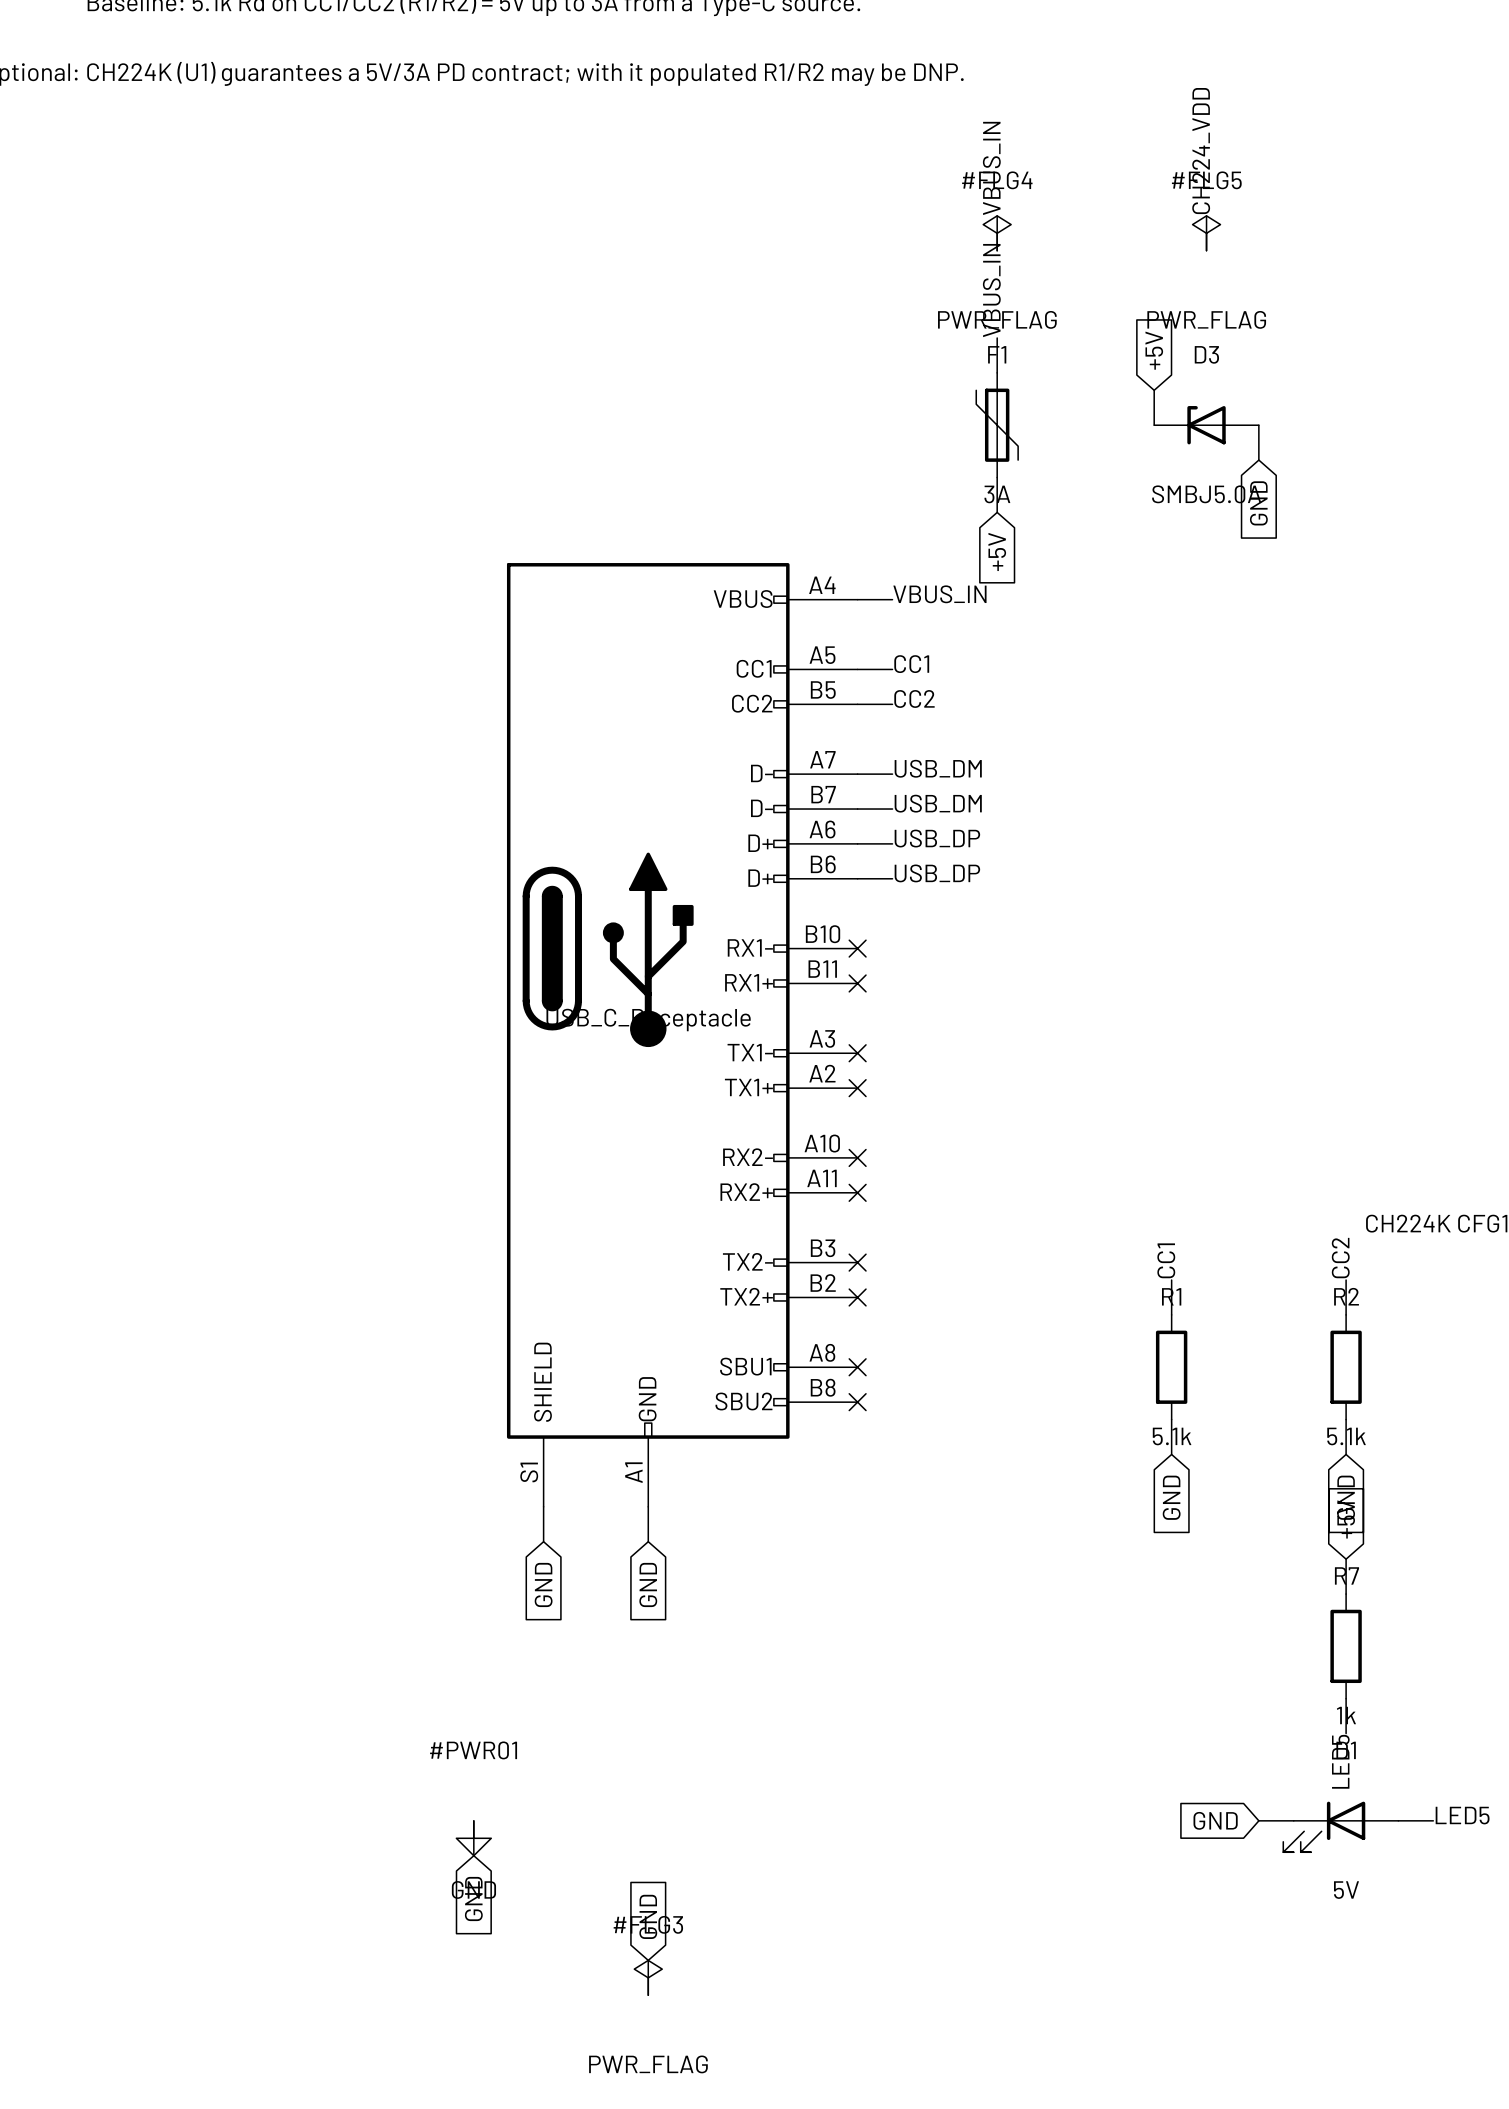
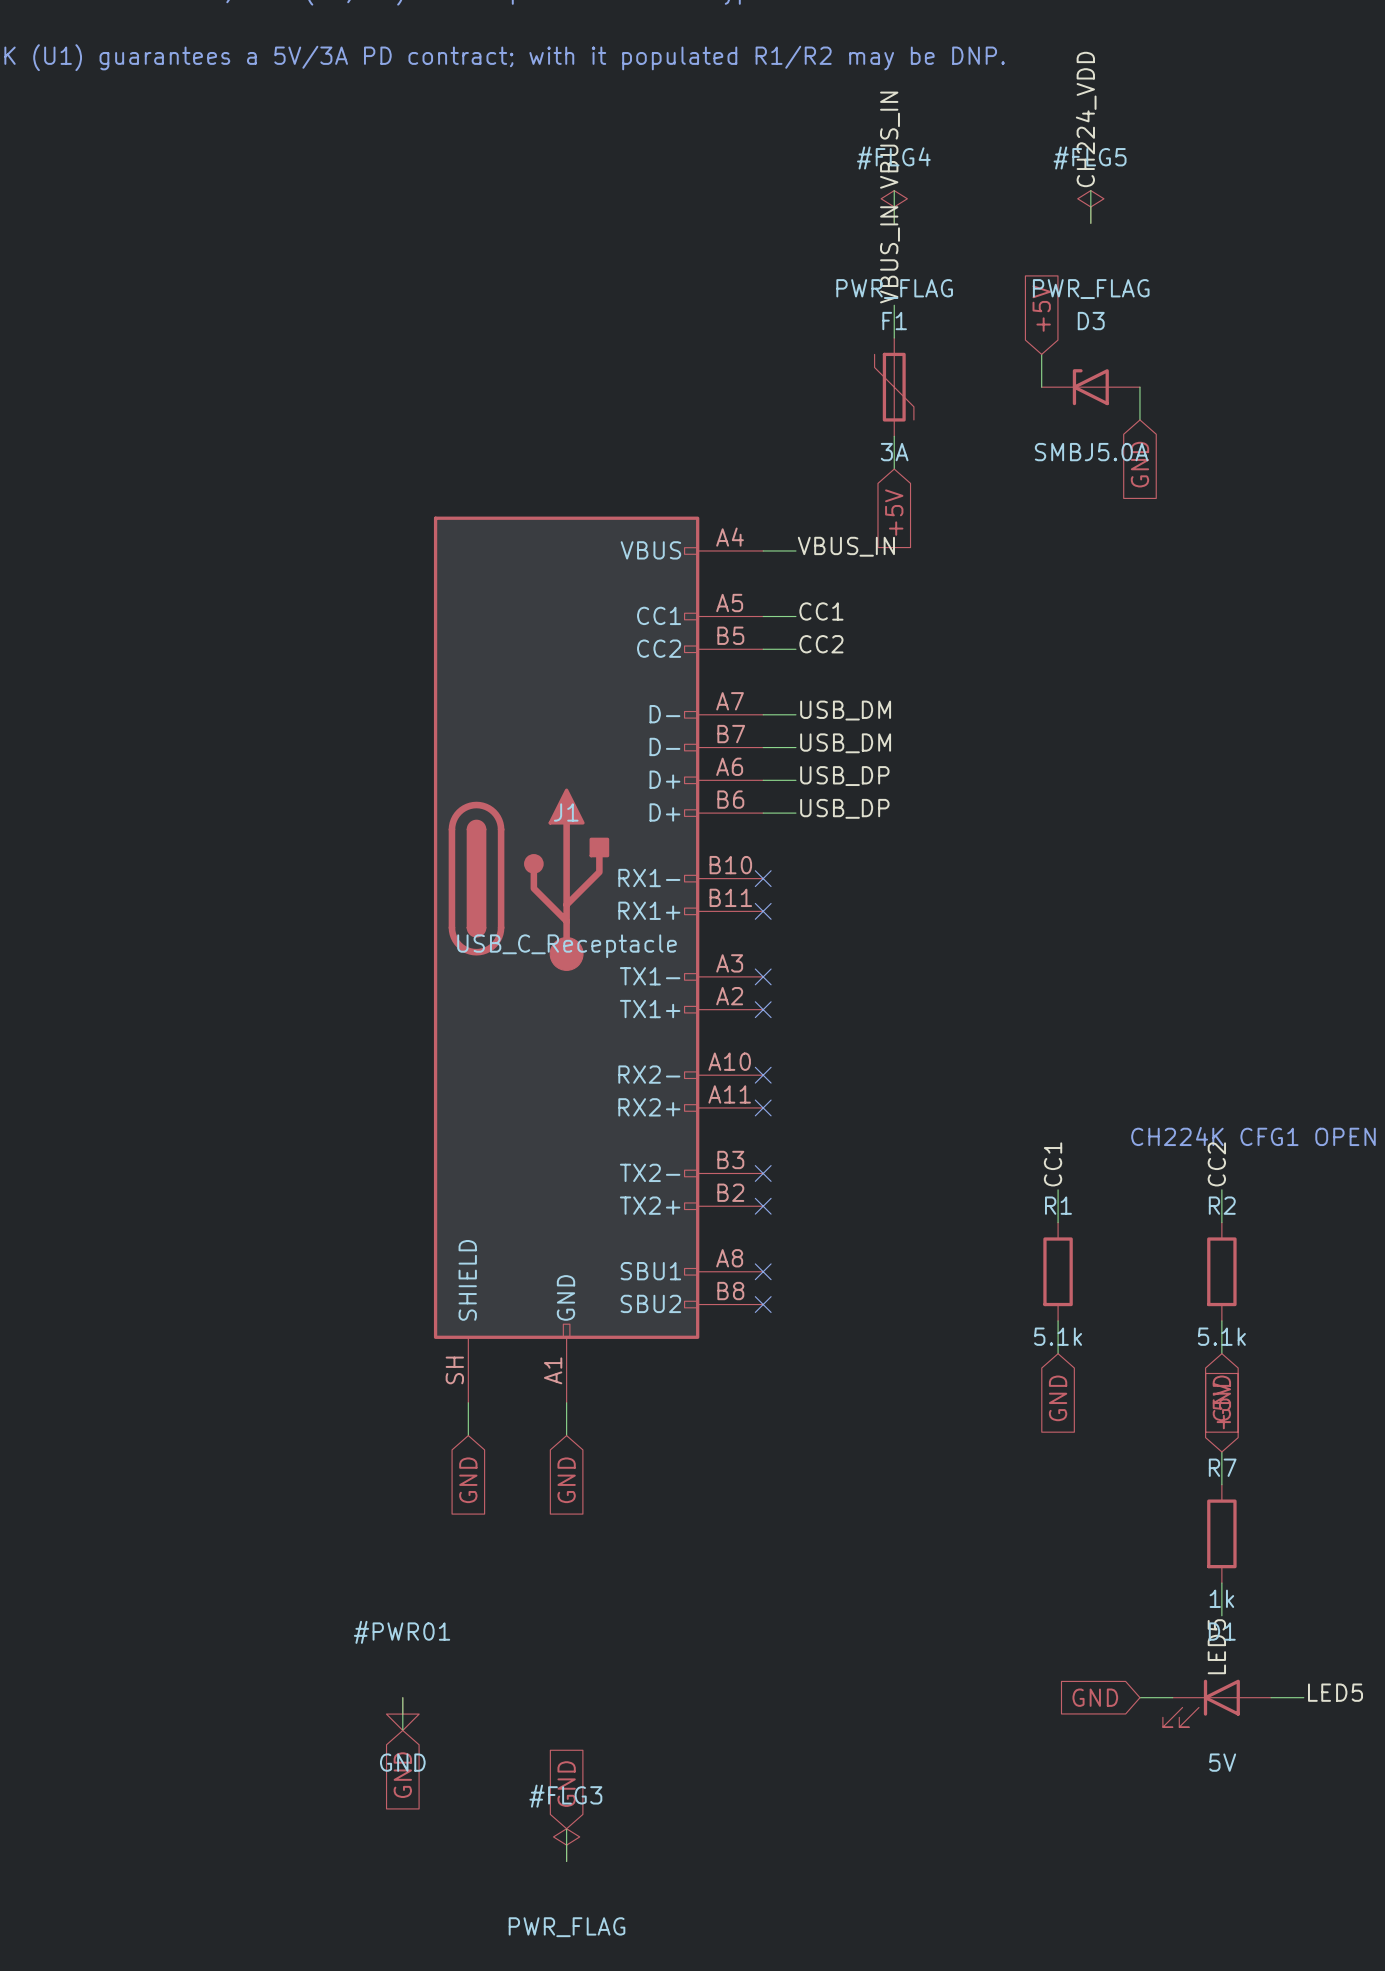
J1 pin number: S1 (529, 1472) -> SH (454, 1370)

